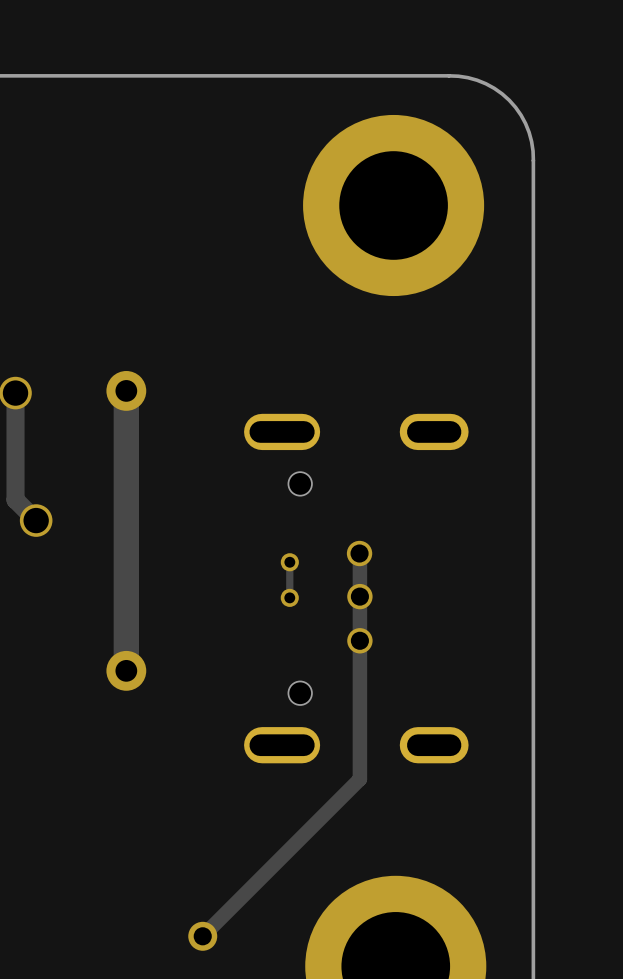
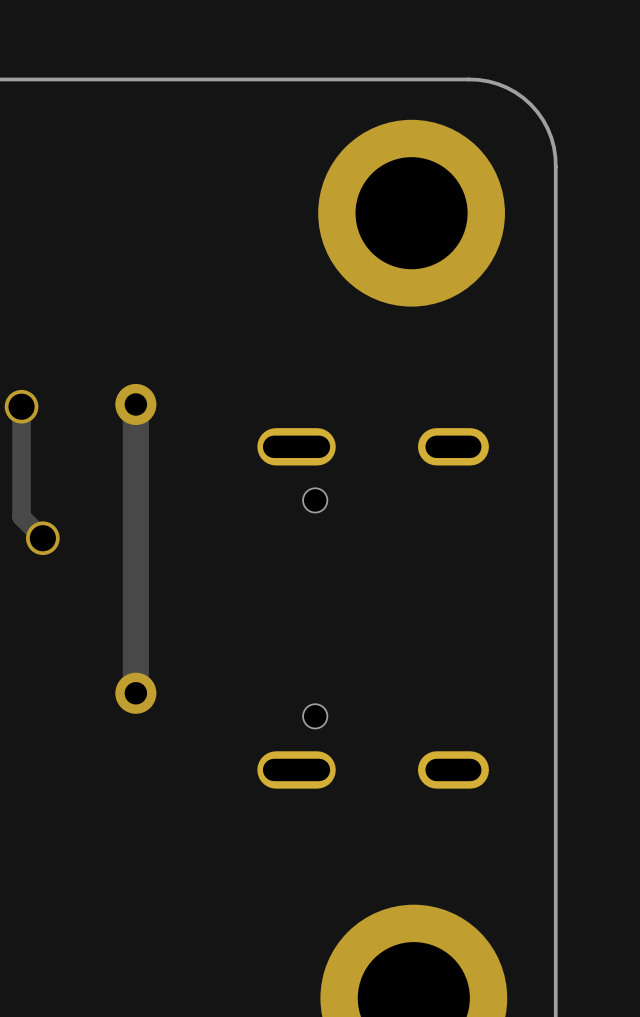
via: (359, 553) -> none
track: (359, 554) (359, 779) (202, 936) -> none
track: (289, 562) (289, 597) -> none
via: (289, 562) -> none
via: (359, 596) -> none
via: (289, 597) -> none
via: (359, 640) -> none
via: (202, 936) -> none

